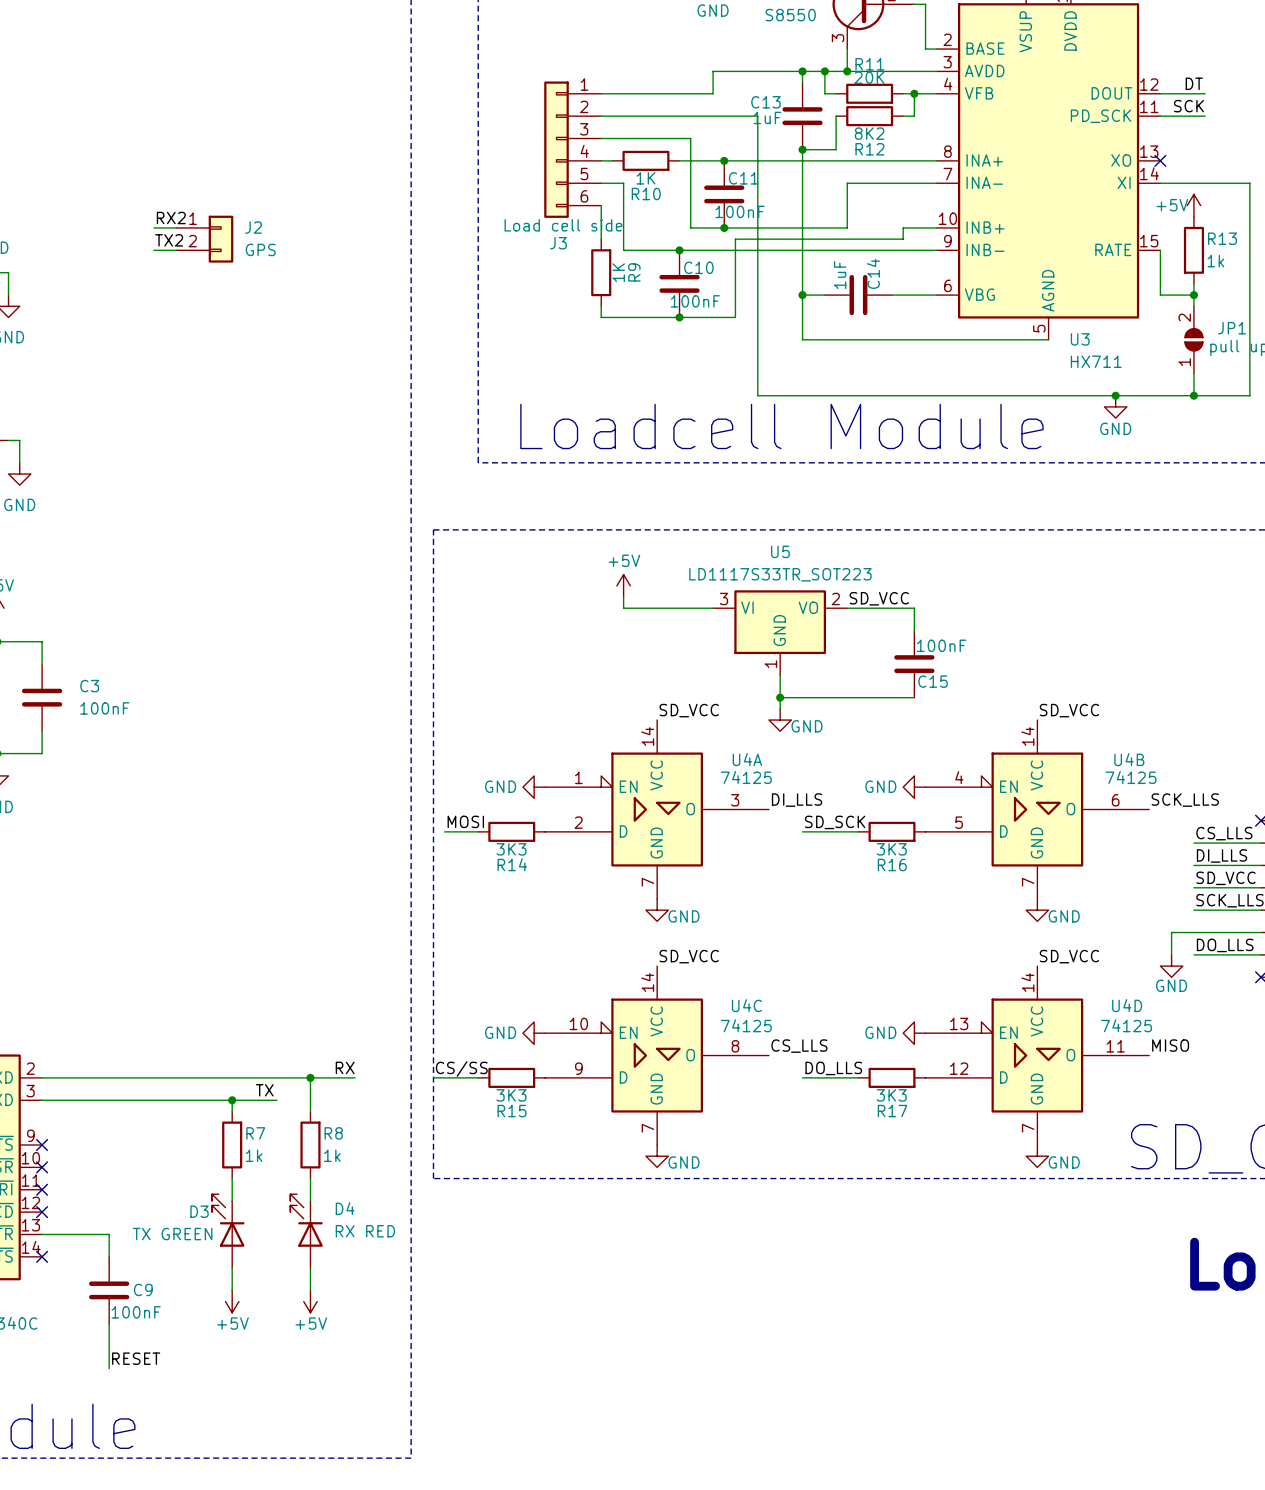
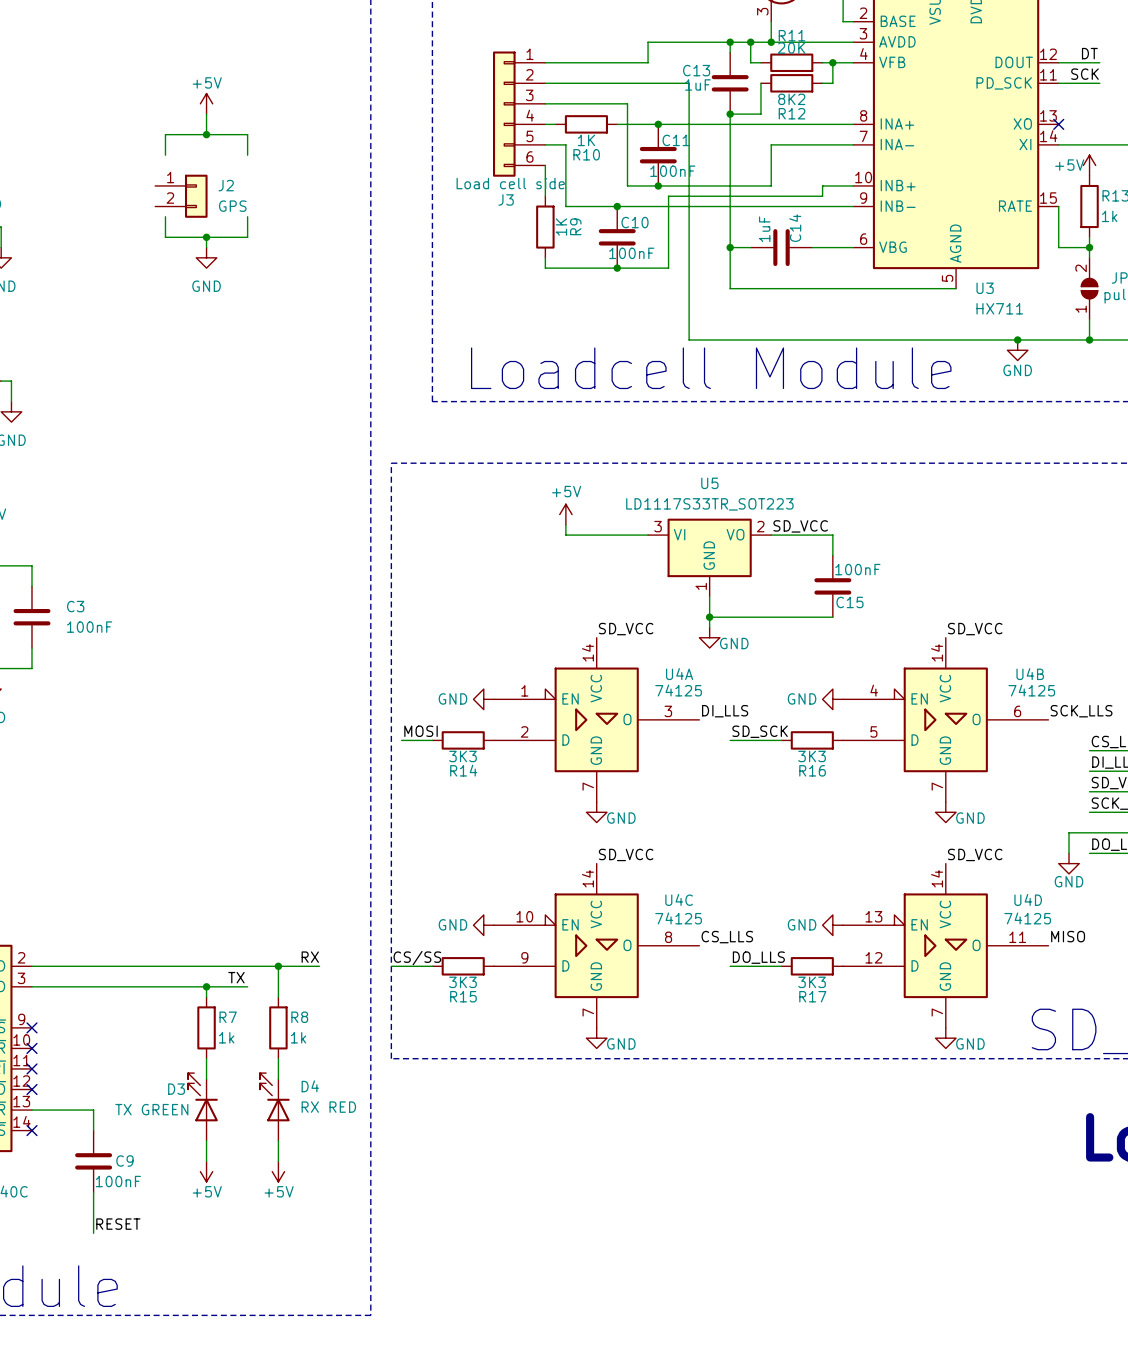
power symbol: none -> +5V (206, 103)
wire: none -> (206, 114) (206, 134)
junction: none -> (206, 134)
wire: none -> (165, 155) (165, 134) (247, 134) (247, 155)
label: RX2 (171, 217) -> none
wire: (153, 227) (176, 227) -> none
label: TX2 (169, 240) -> none
wire: (153, 250) (176, 250) -> none
wire: none -> (165, 216) (165, 237) (247, 237) (247, 216)
wire: none -> (206, 237) (206, 247)
junction: none -> (206, 237)
power symbol: none -> GND (206, 257)

